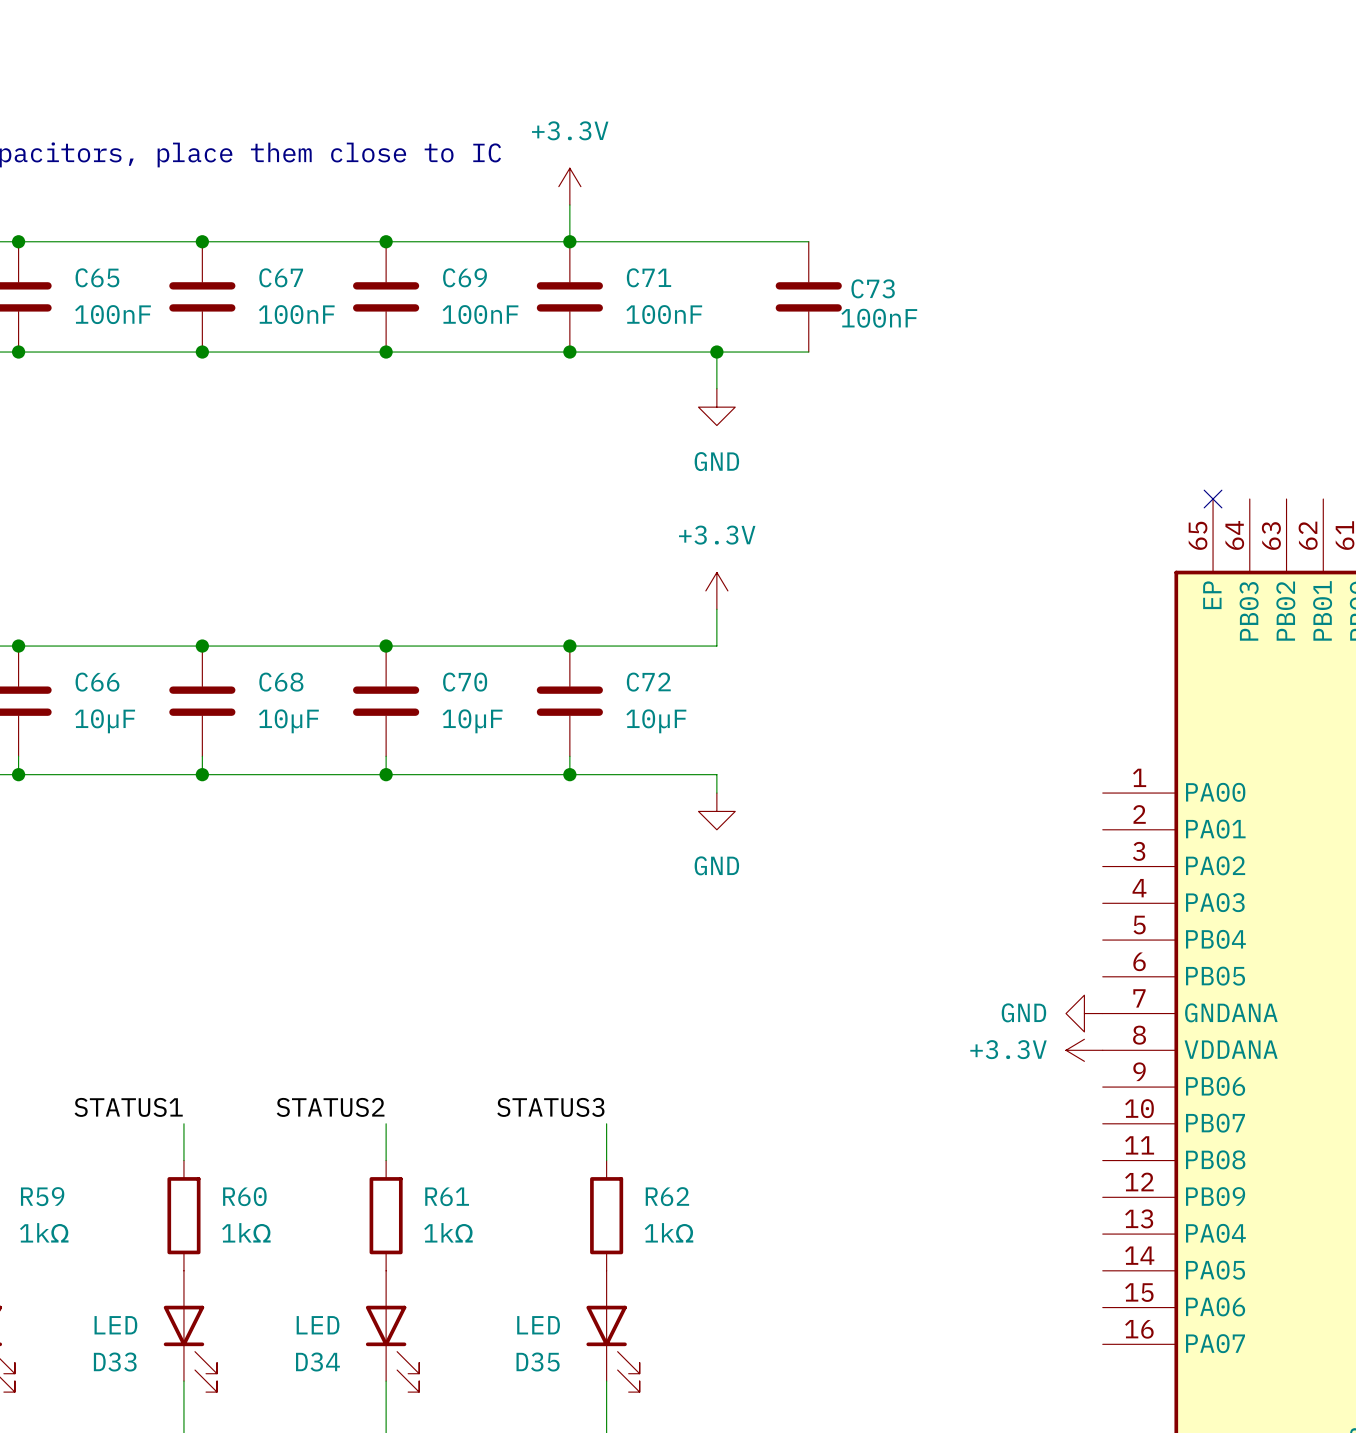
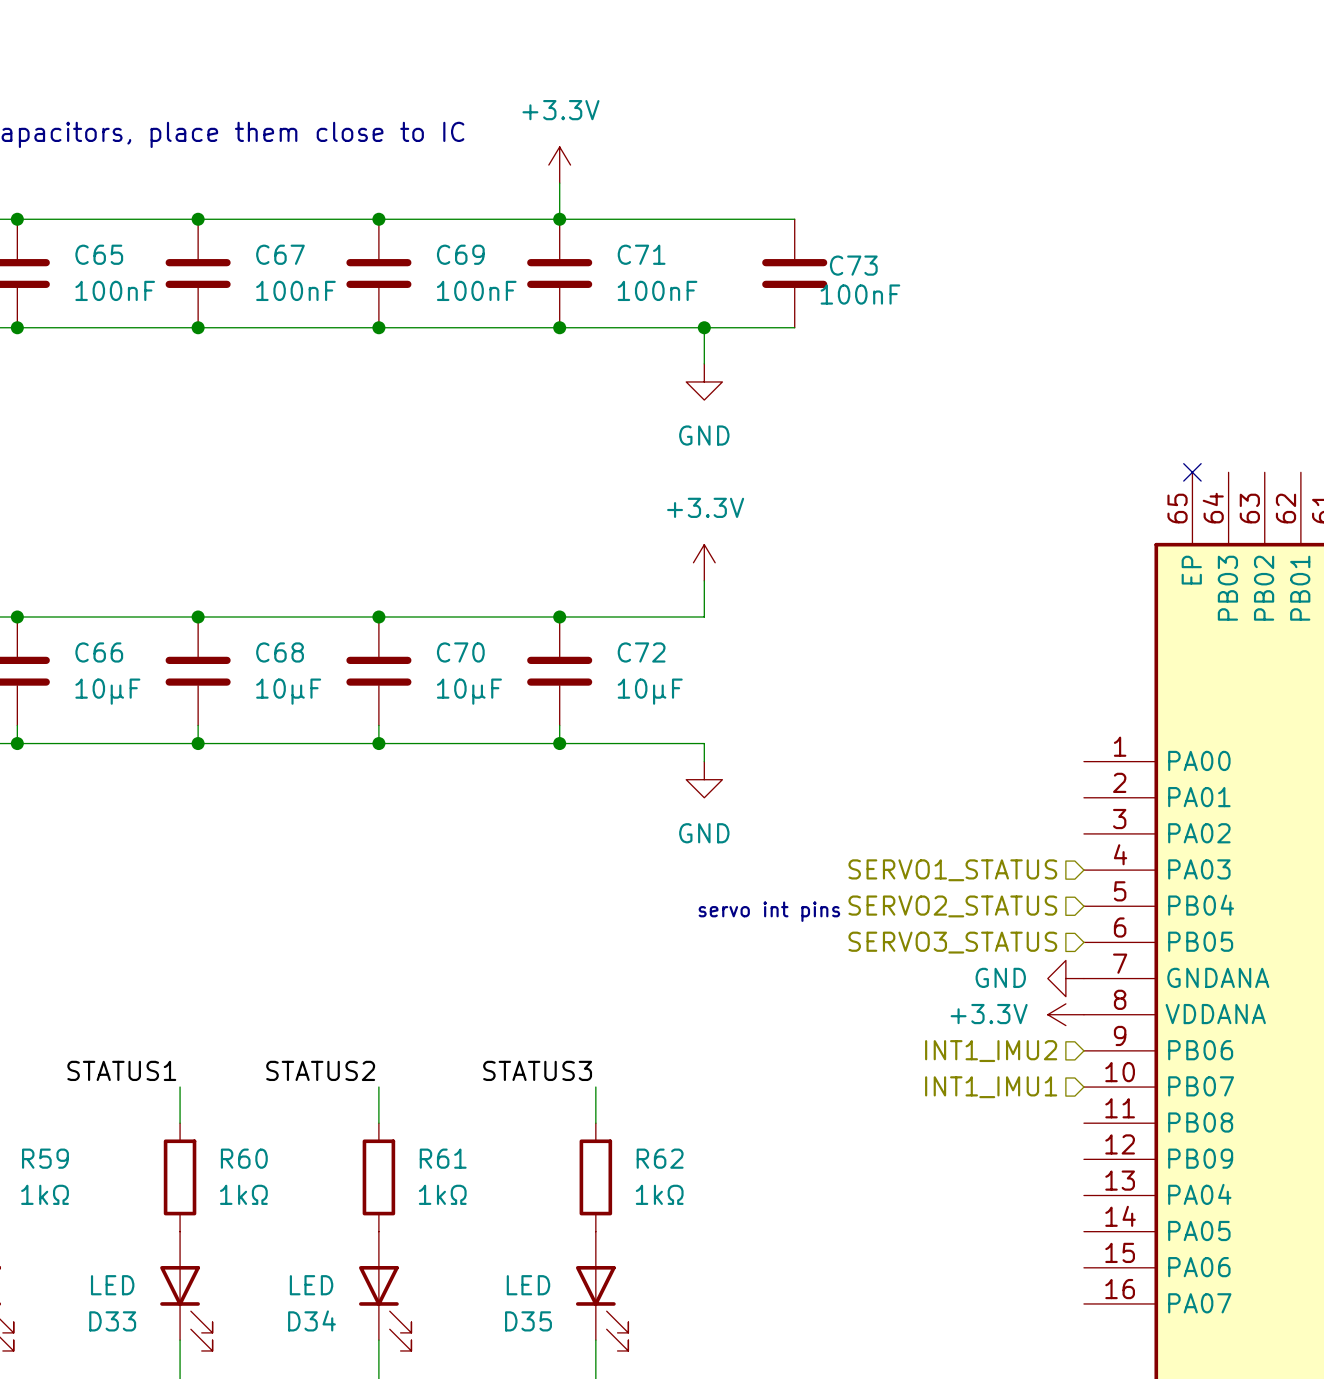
hierarchical label: none -> SERVO1_STATUS (952, 870)
hierarchical label: none -> SERVO2_STATUS (952, 906)
text: none -> servo int pins (769, 911)
hierarchical label: none -> SERVO3_STATUS (952, 942)
hierarchical label: none -> INT1_IMU2 (991, 1051)
hierarchical label: none -> INT1_IMU1 (991, 1087)

